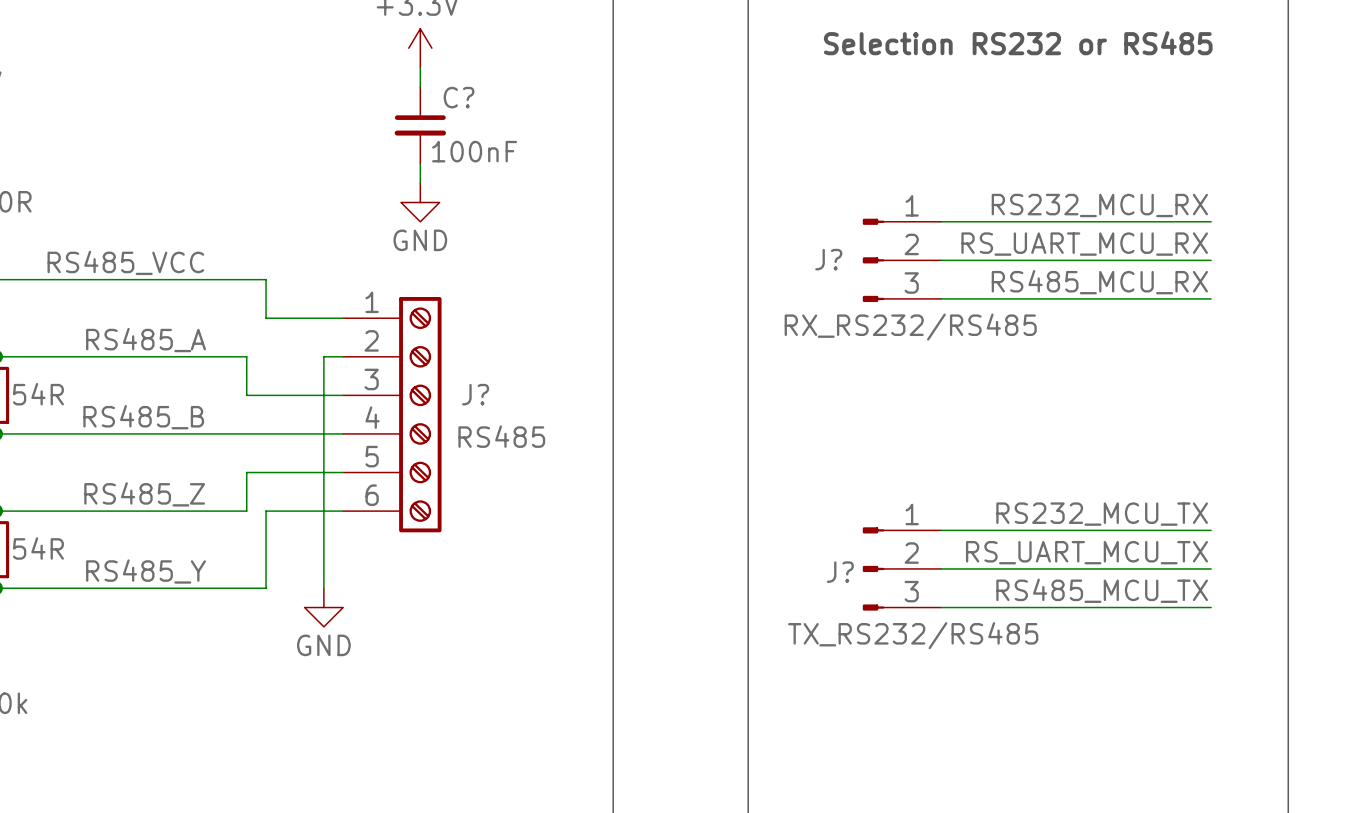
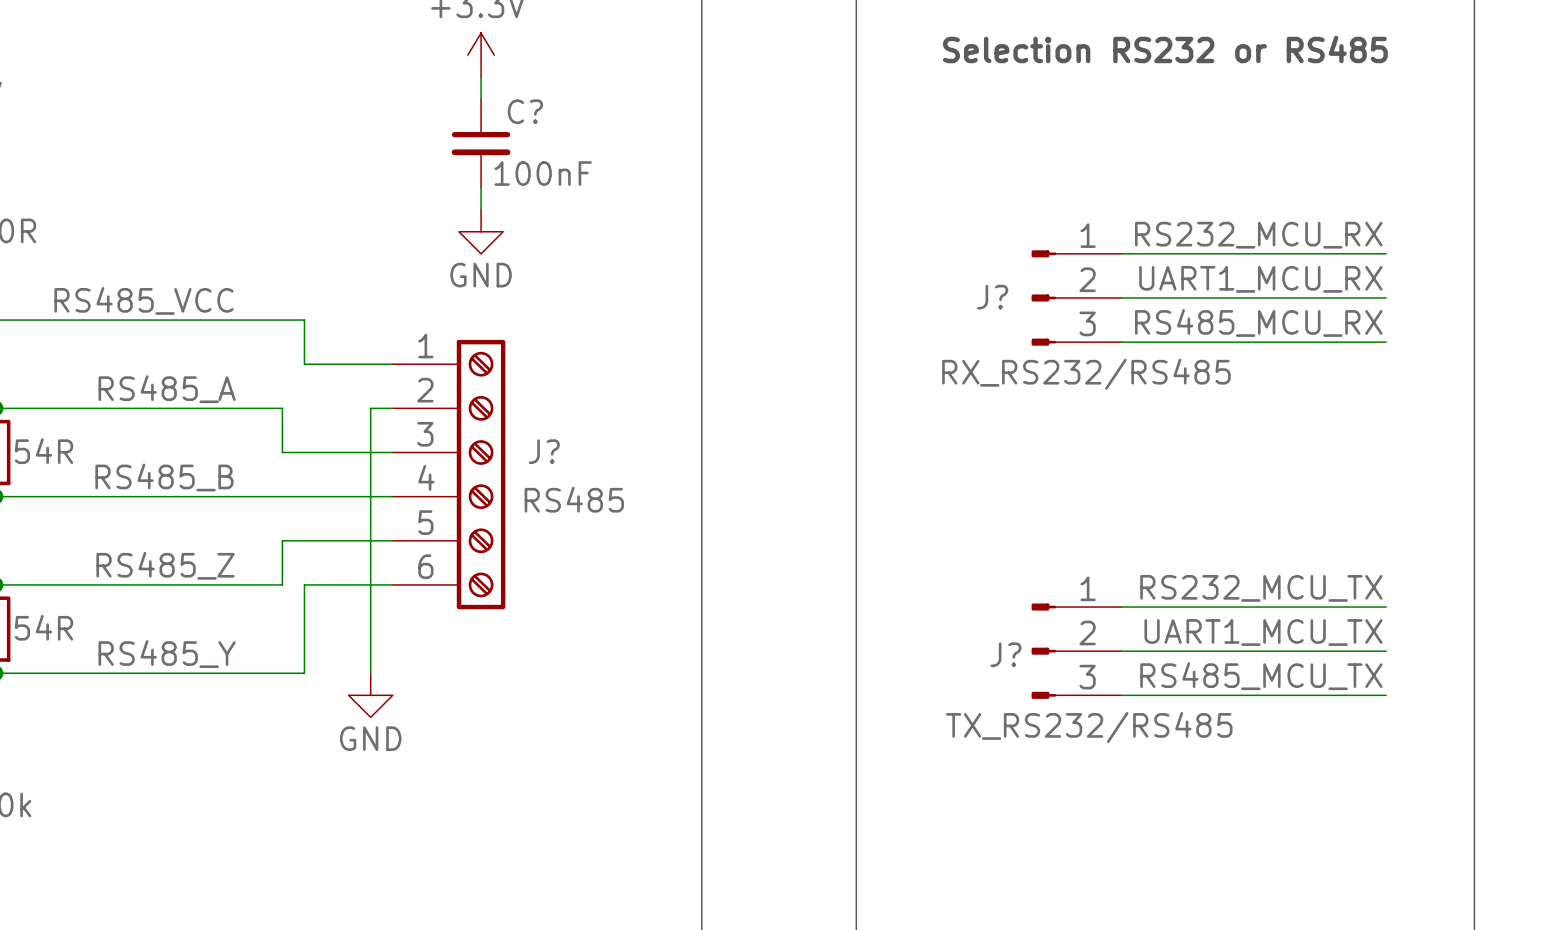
label: RS_UART_MCU_RX (1084, 244) -> UART1_MCU_RX (1260, 279)
J? position: (901, 260) -> (1076, 297)
label: RS_UART_MCU_TX (1086, 552) -> UART1_MCU_TX (1263, 632)
J? position: (901, 568) -> (1076, 651)

